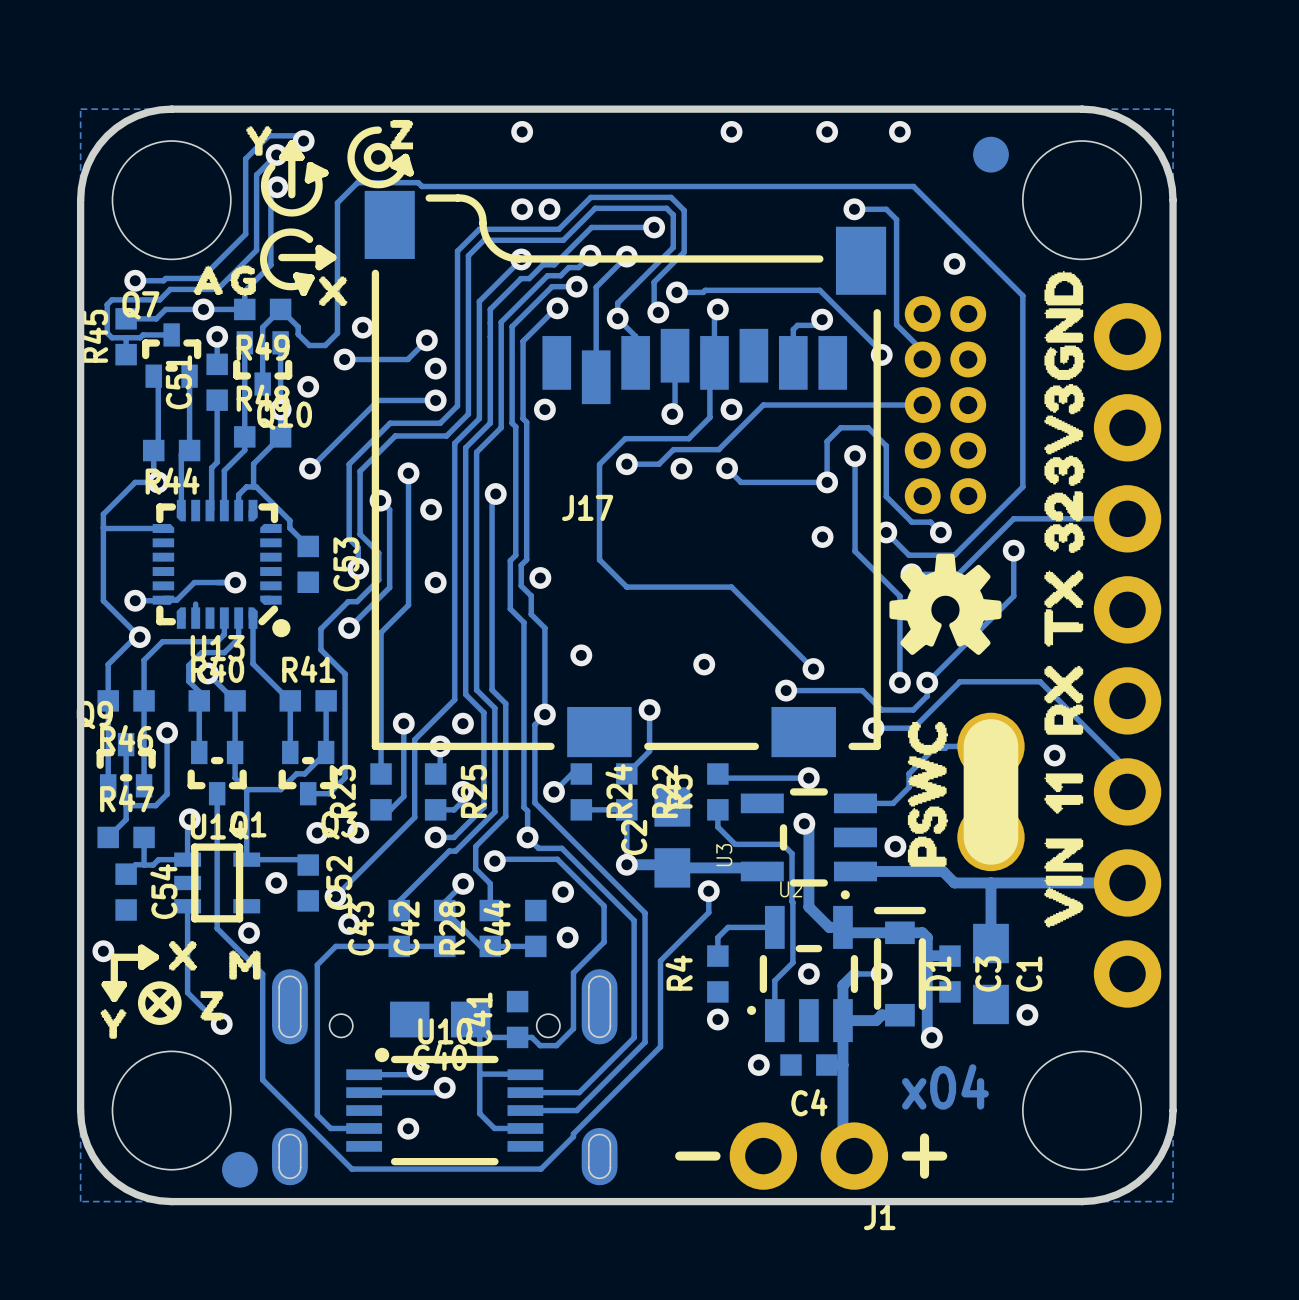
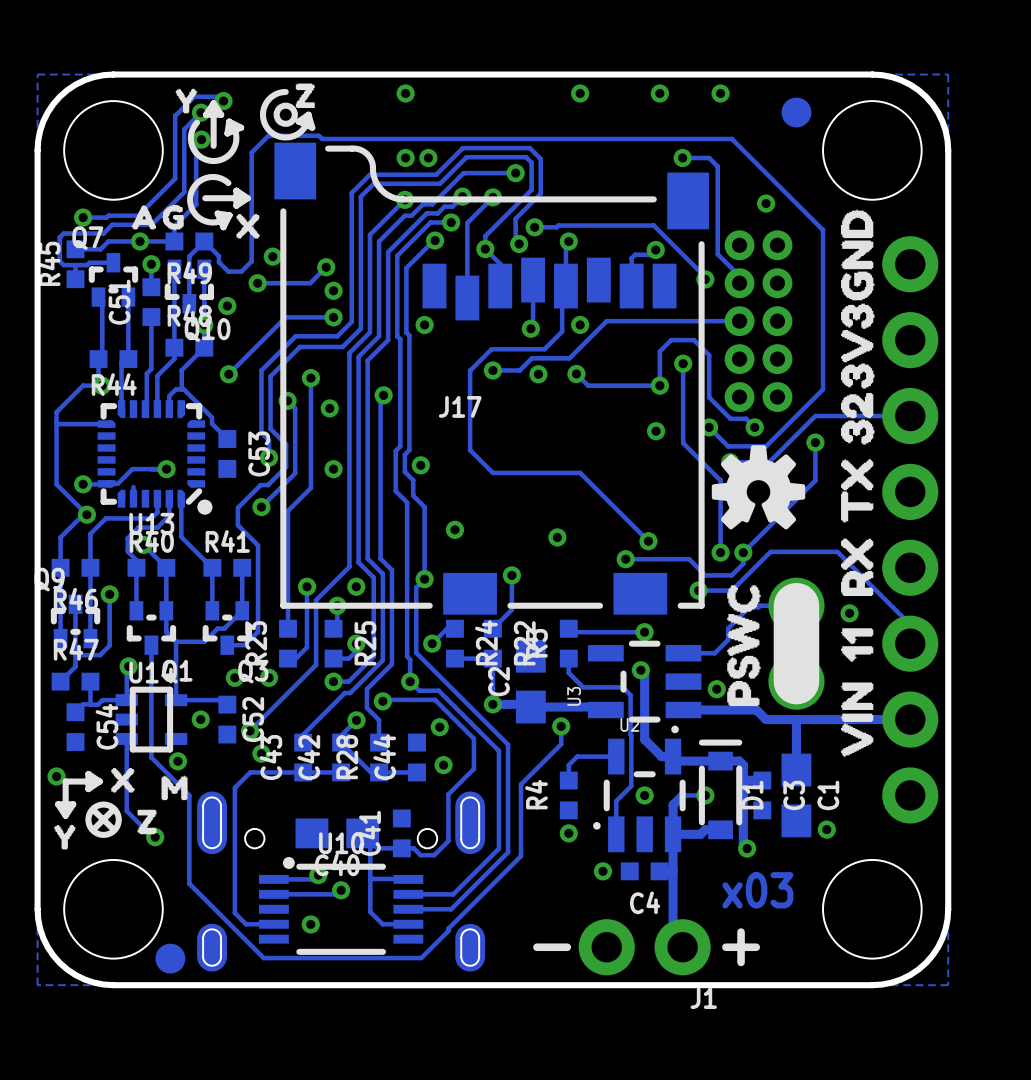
text: x04 (945, 1086) -> x03 (757, 890)

